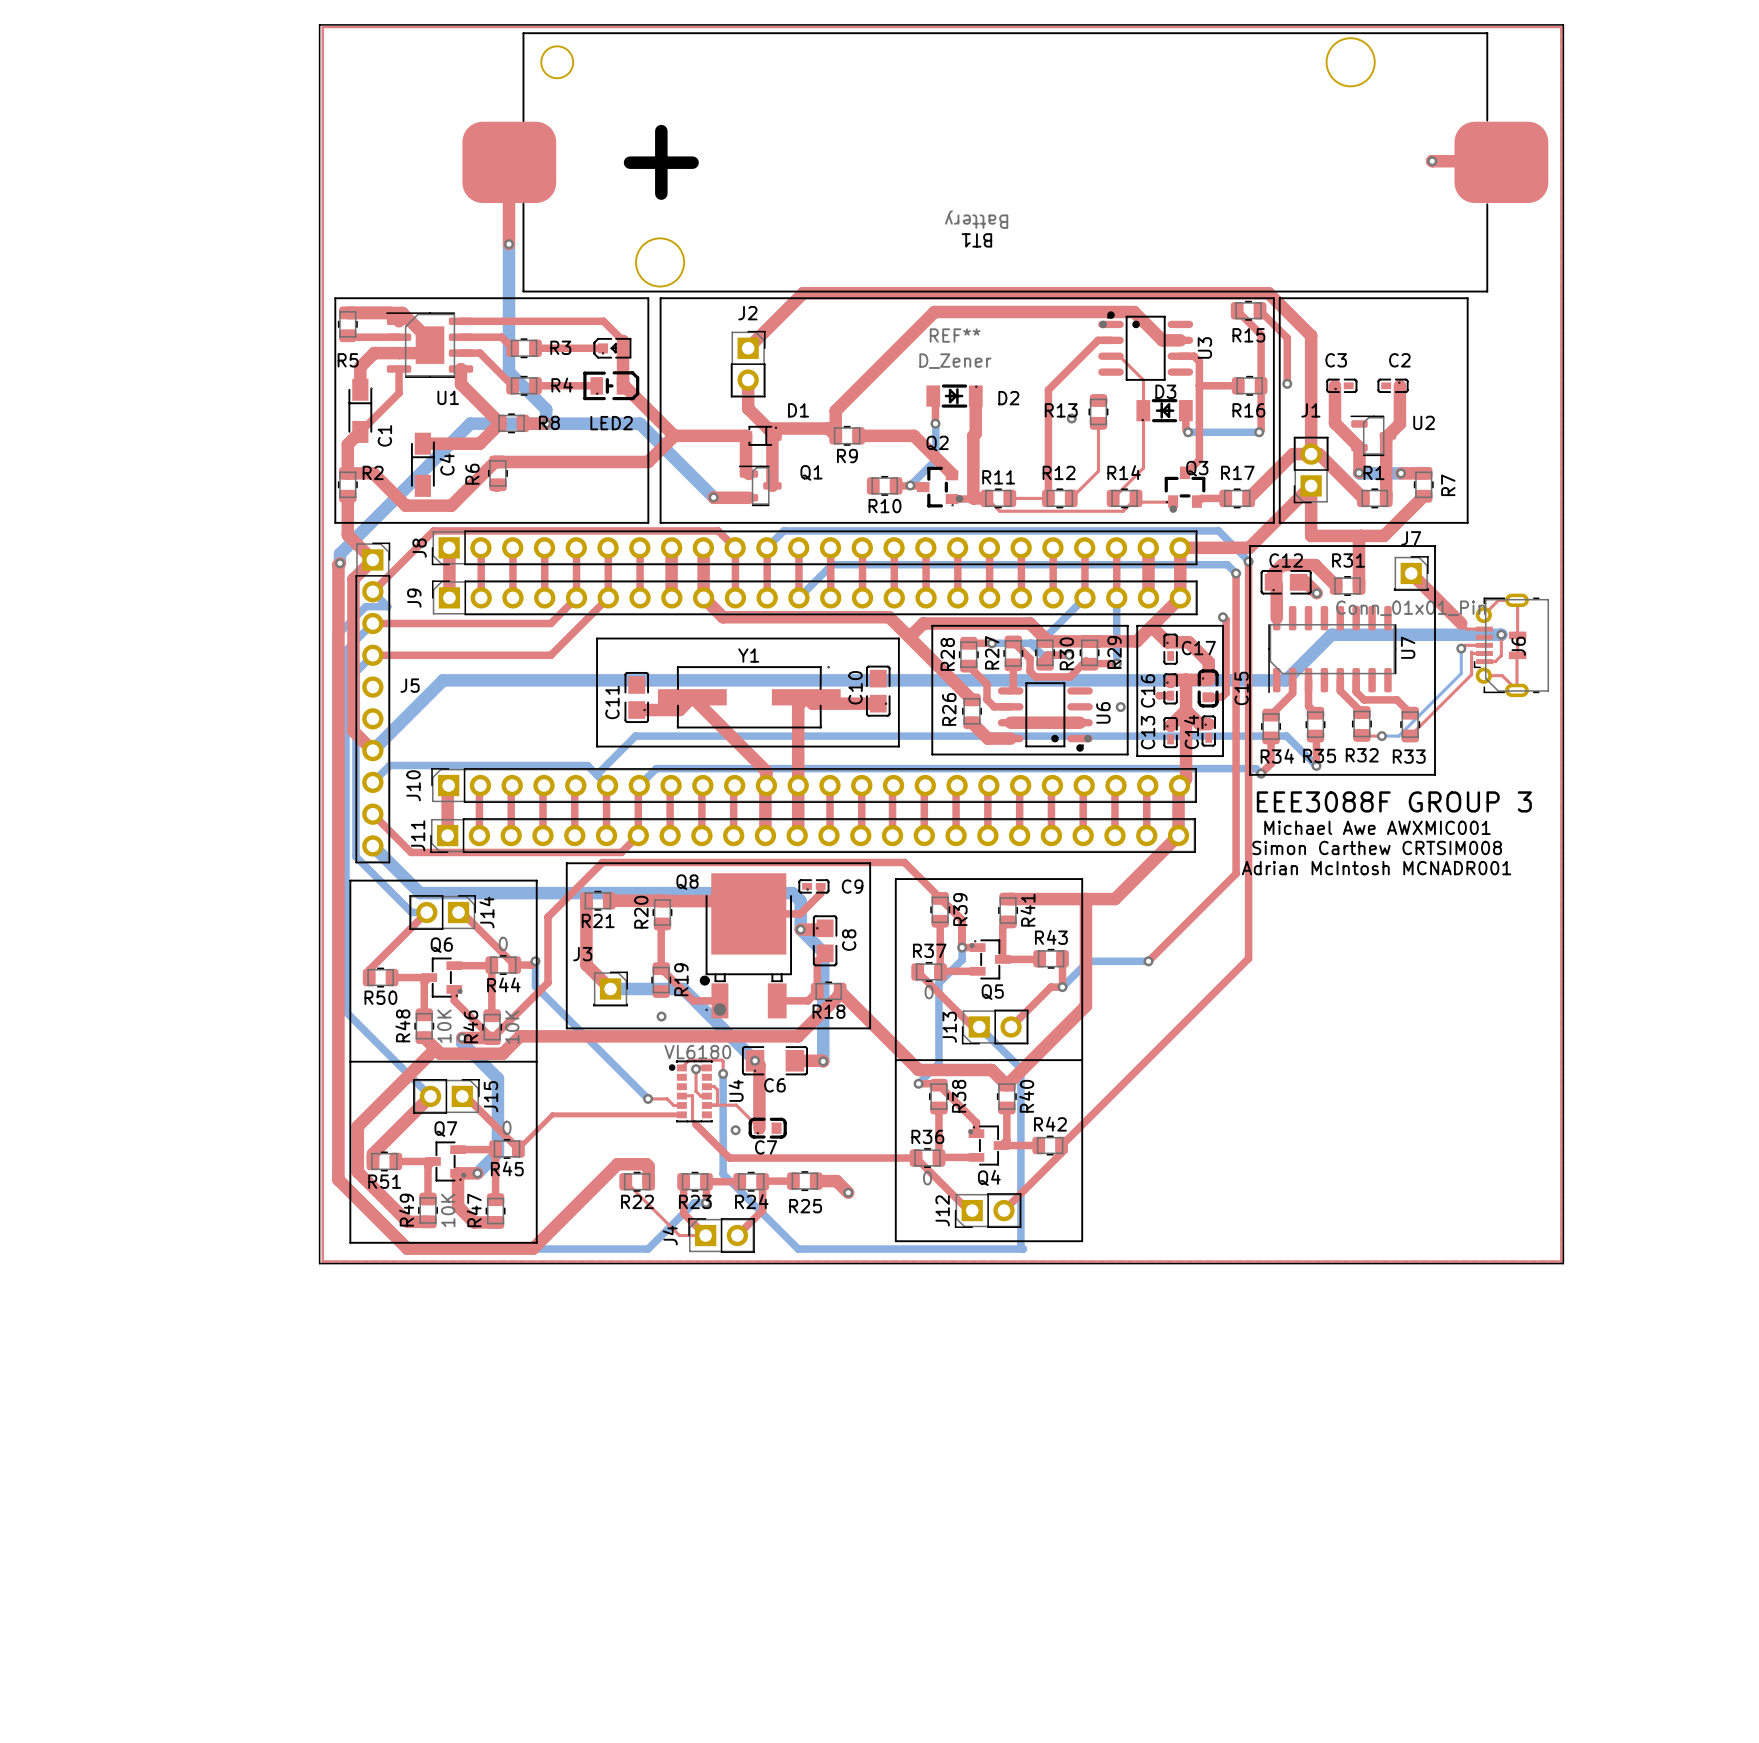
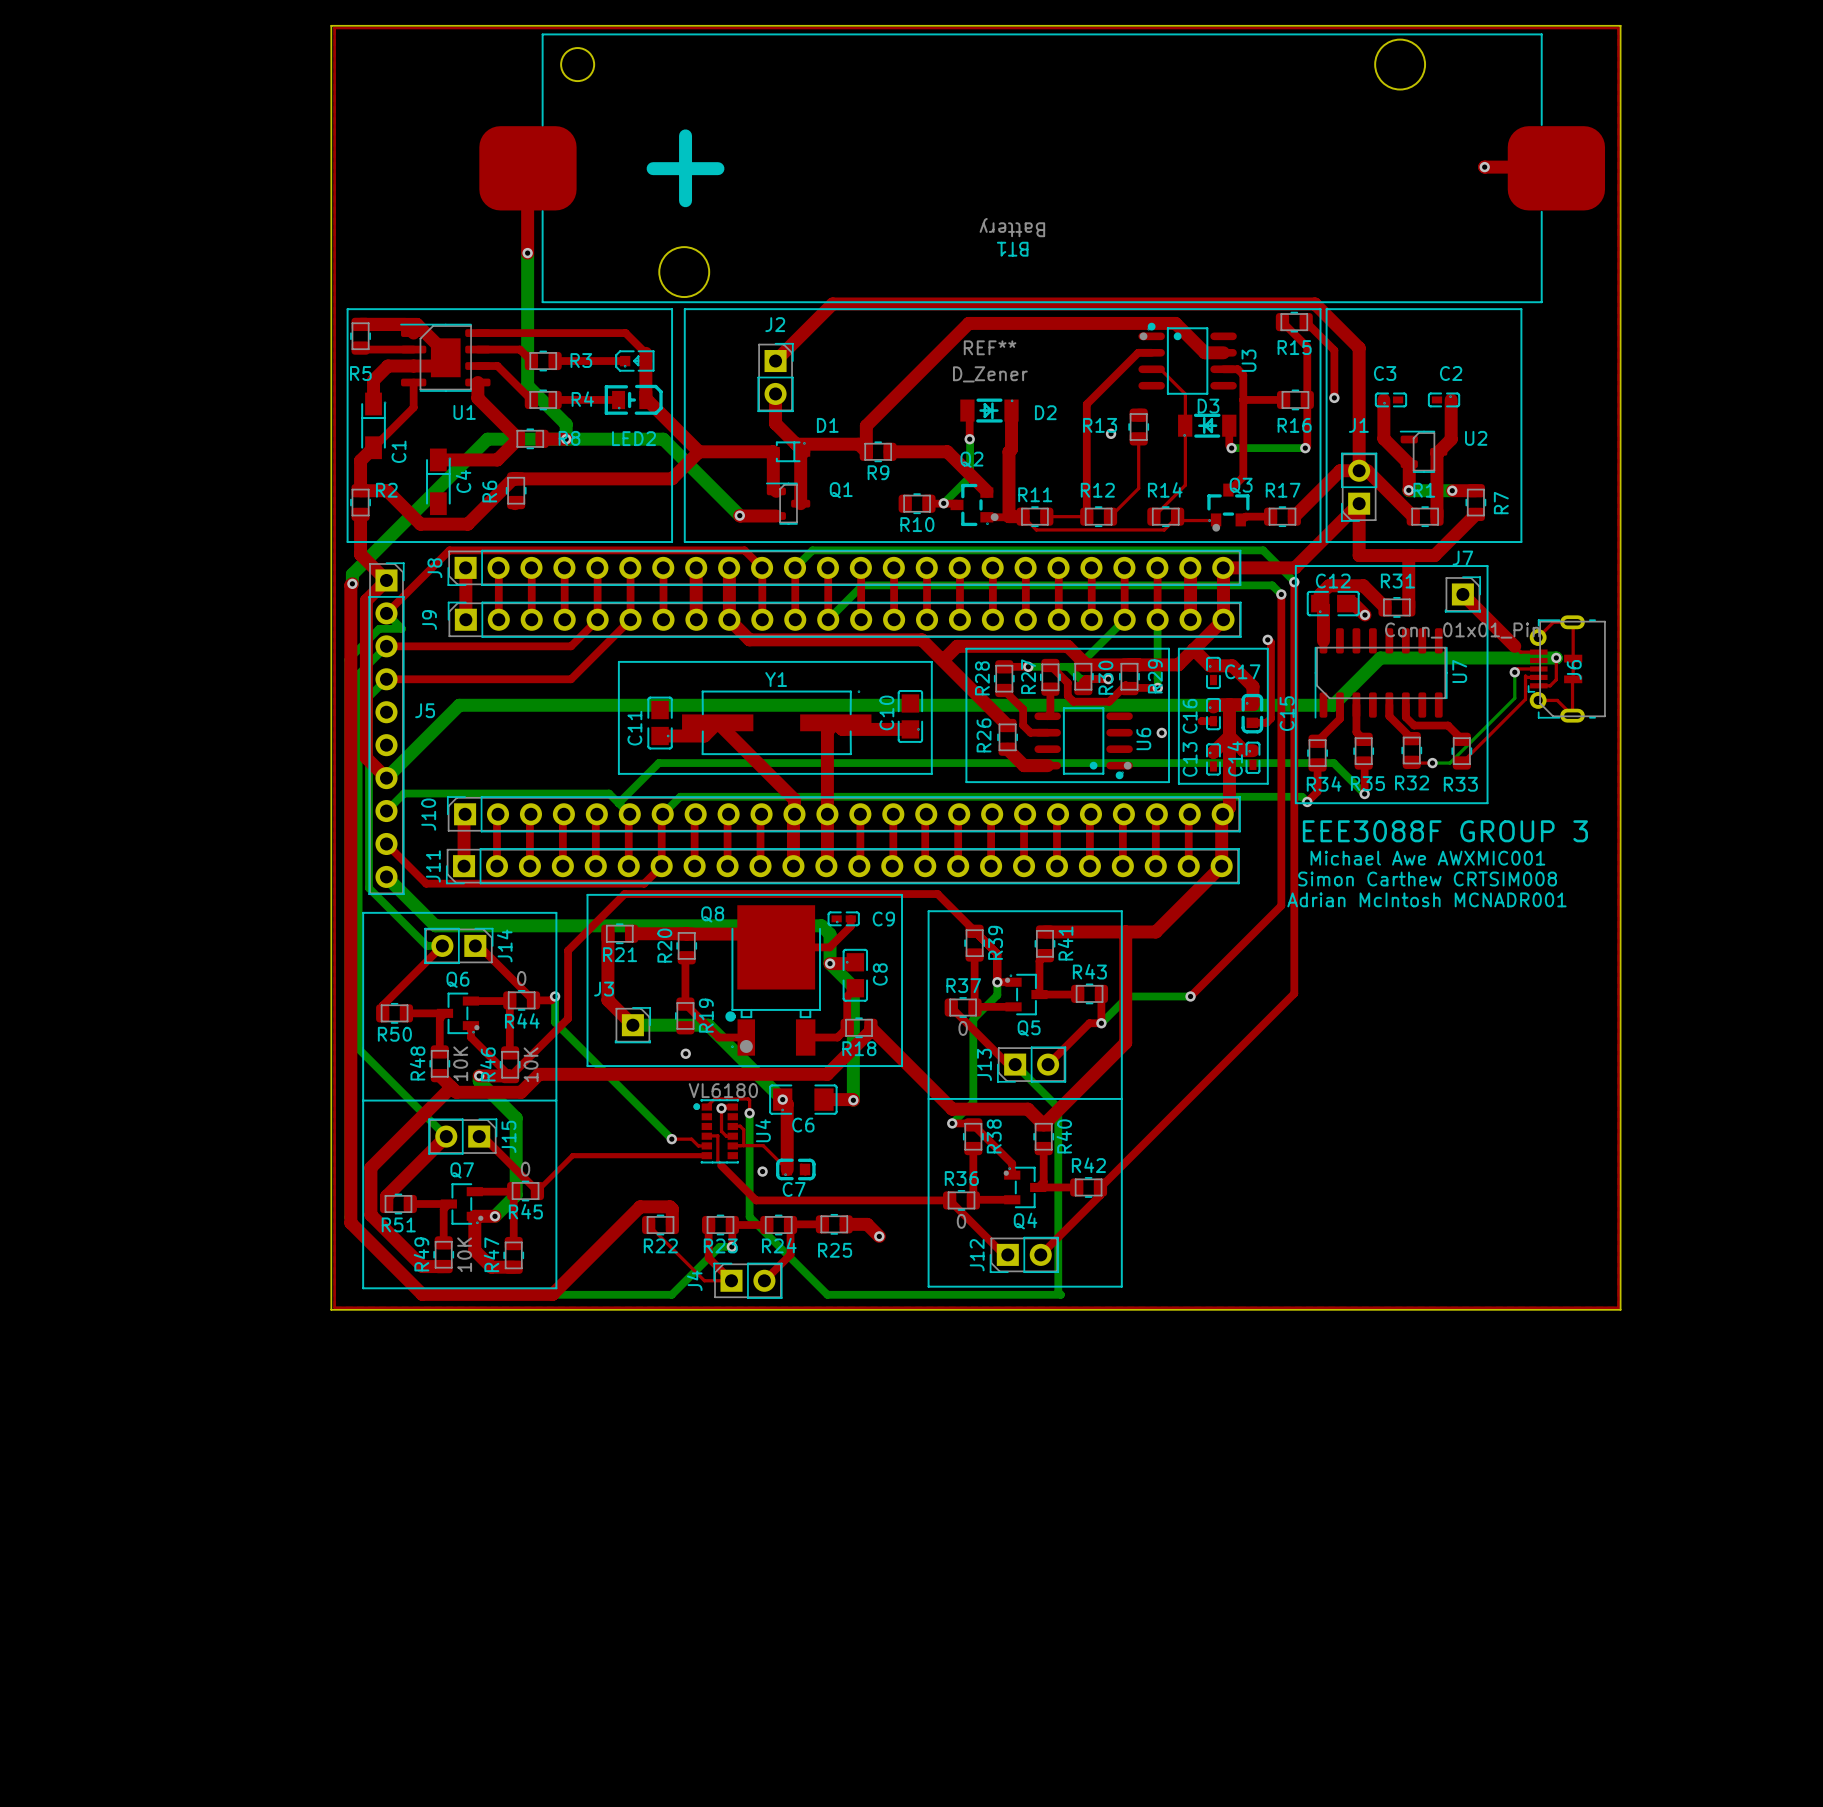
top track: (1010, 722) (1080, 722) -> none

